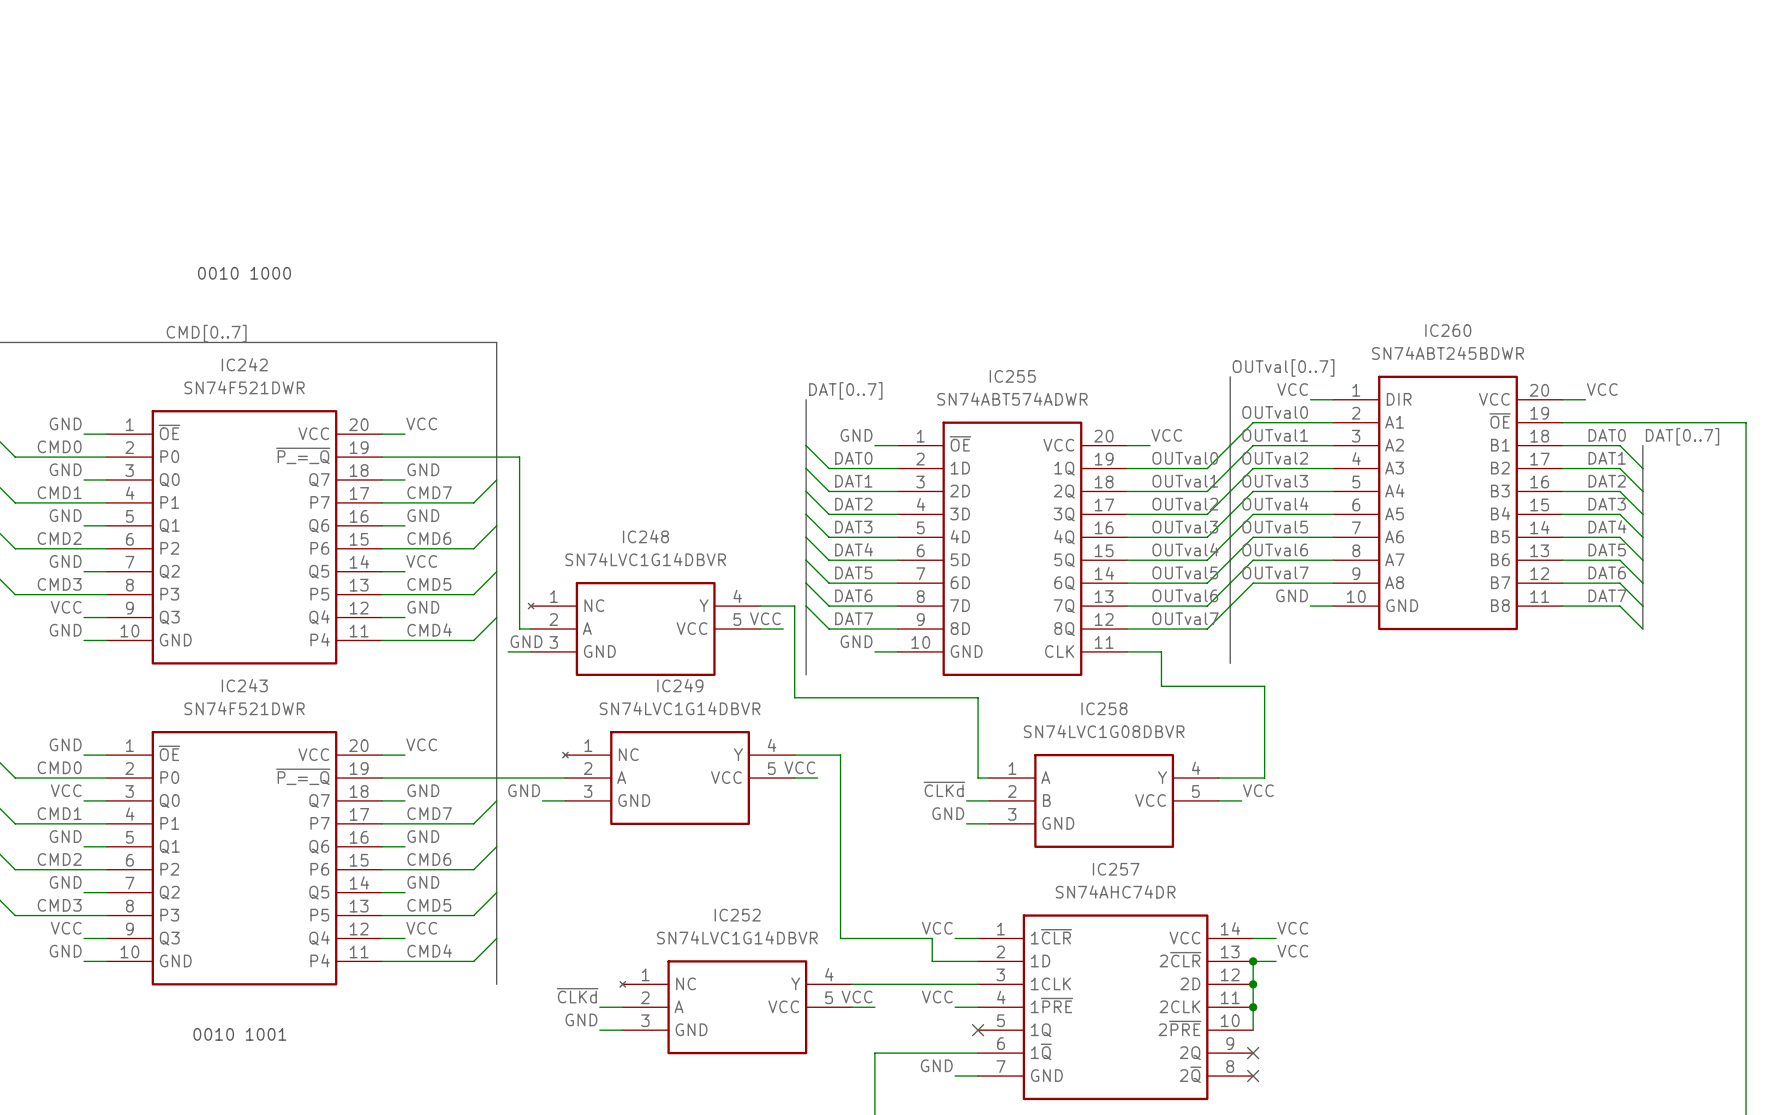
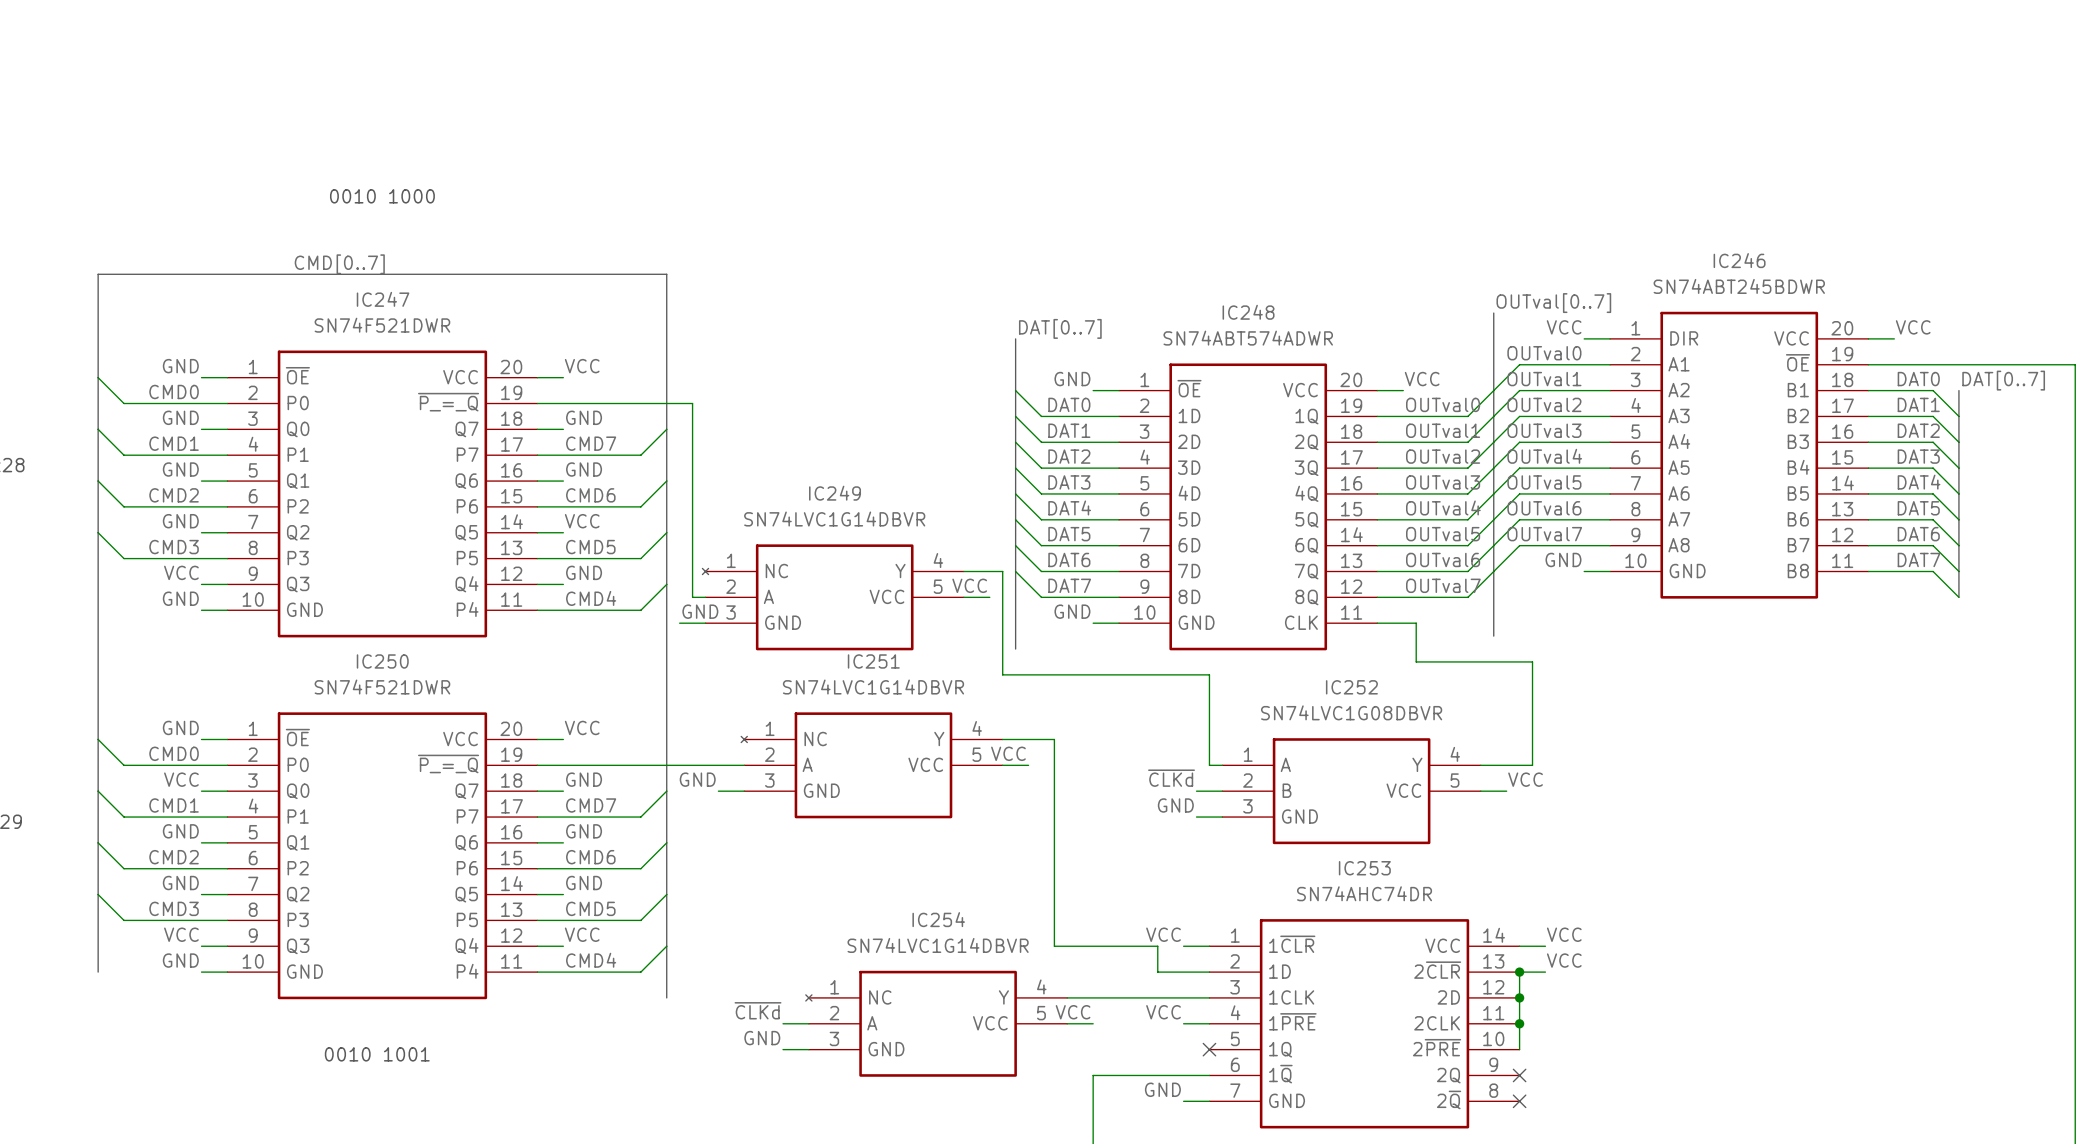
IC260 name: IC260 (1448, 330) -> IC246 (1739, 260)
IC242 name: IC242 (244, 364) -> IC247 (383, 299)
IC255 name: IC255 (1012, 376) -> IC248 (1248, 312)
IC248 name: IC248 (645, 536) -> IC249 (835, 493)
IC243 name: IC243 (244, 685) -> IC250 (382, 661)
IC249 name: IC249 (680, 685) -> IC251 (873, 661)
IC258 name: IC258 (1104, 708) -> IC252 (1351, 687)
IC257 name: IC257 (1116, 869) -> IC253 (1364, 868)
IC252 name: IC252 (737, 915) -> IC254 (938, 919)

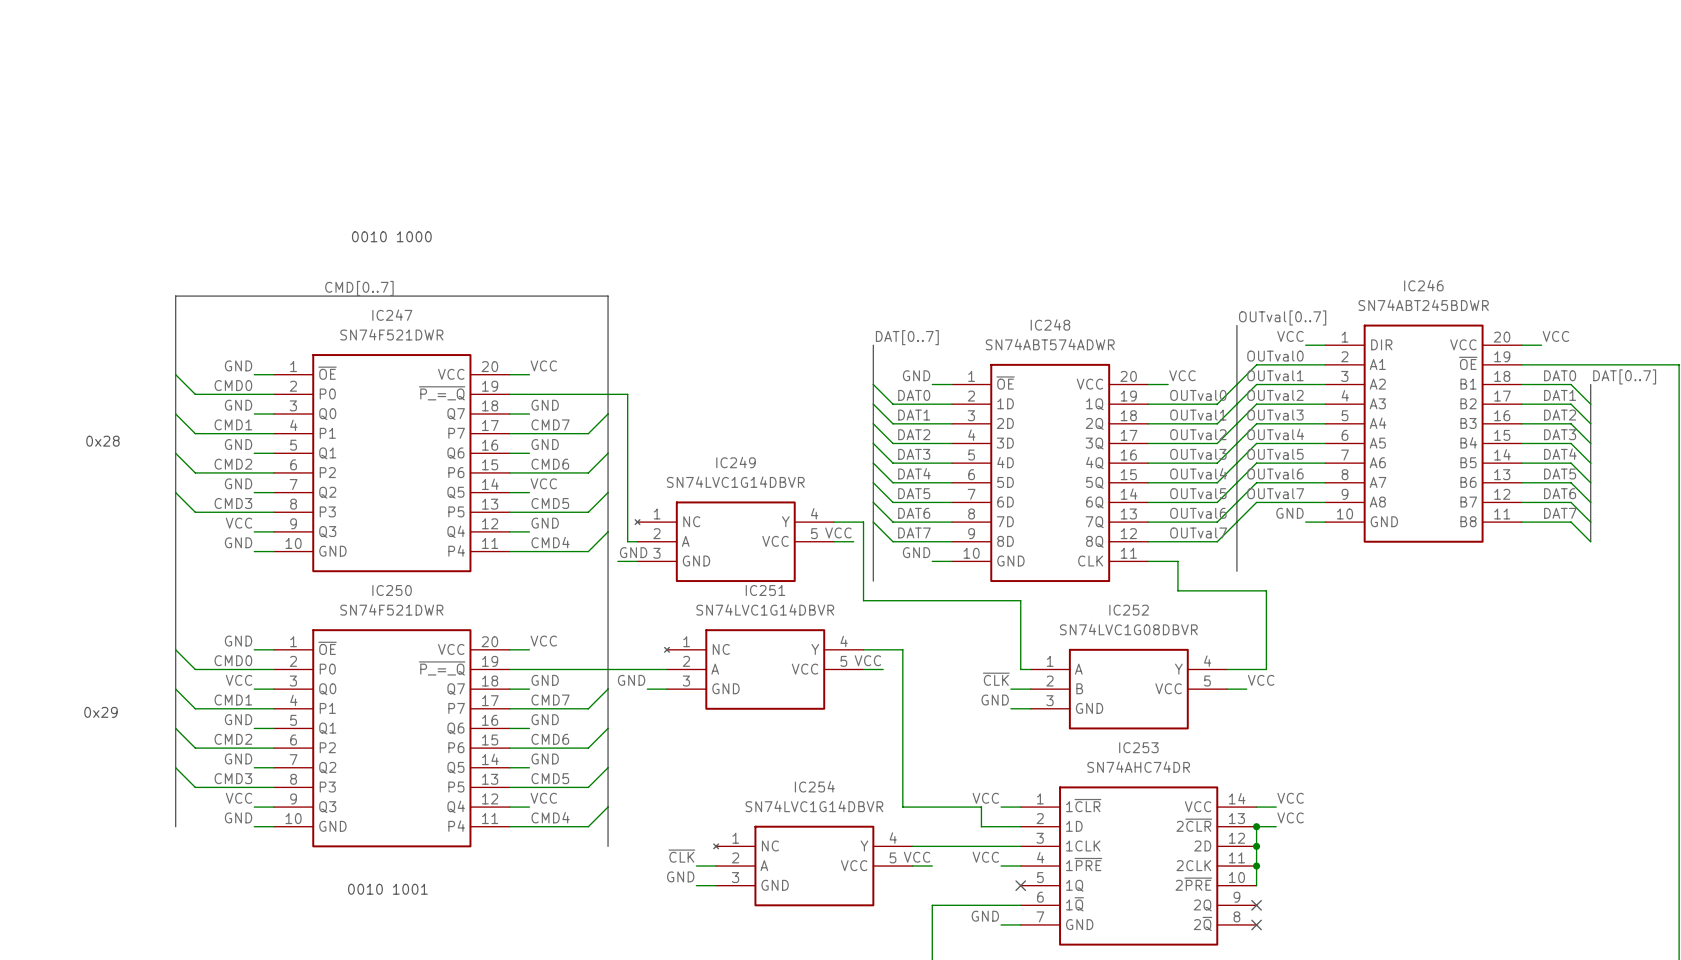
label: ~{CLKd} (1171, 778) -> ~{CLK} (996, 679)
label: ~{CLKd} (758, 1010) -> ~{CLK} (681, 856)

